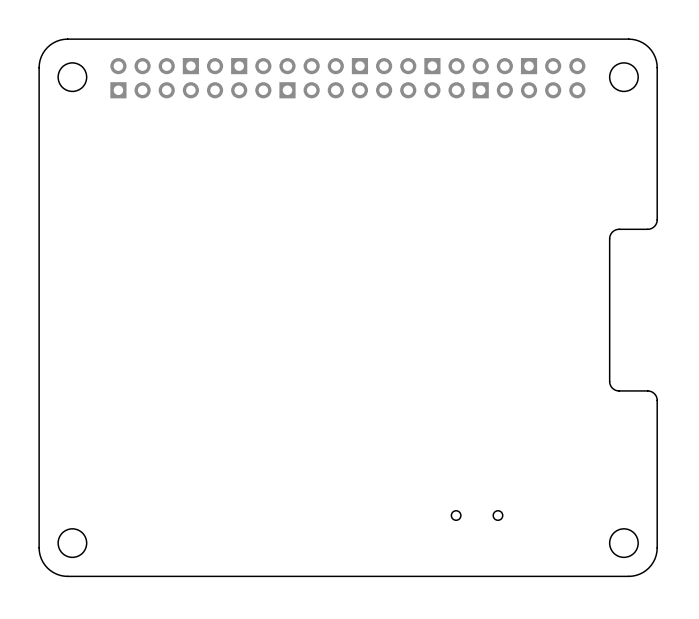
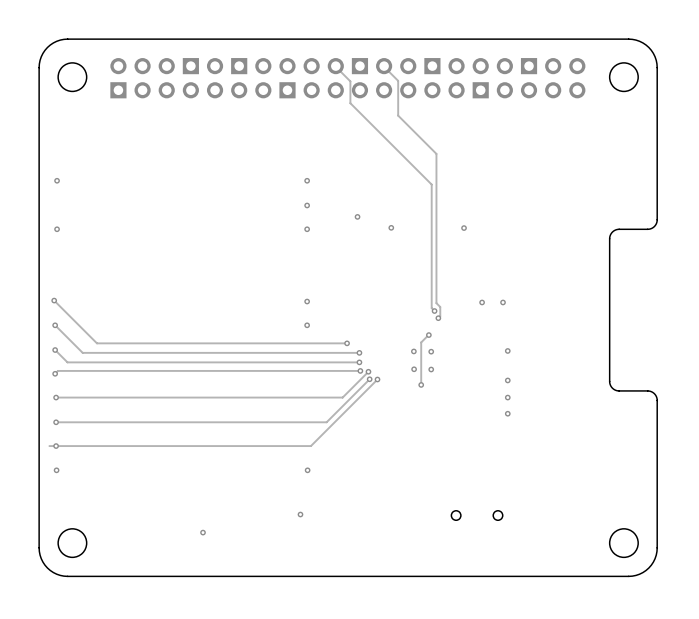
track: none -> (338, 69) (350, 81) (350, 103) (431, 184) (431, 308) (434, 311)
track: none -> (386, 69) (398, 80) (398, 115) (436, 153) (436, 303) (440, 307) (440, 316) (438, 318)
via: none -> (57, 180)
via: none -> (307, 180)
via: none -> (307, 205)
via: none -> (357, 216)
via: none -> (391, 227)
via: none -> (464, 228)
via: none -> (57, 229)
via: none -> (307, 229)
track: none -> (54, 300) (96, 343) (347, 343)
via: none -> (54, 300)
via: none -> (307, 301)
via: none -> (482, 302)
via: none -> (503, 302)
via: none -> (434, 311)
via: none -> (438, 318)
track: none -> (55, 325) (82, 352) (359, 352)
via: none -> (55, 325)
via: none -> (307, 325)
track: none -> (428, 335) (421, 342) (421, 384)
via: none -> (428, 335)
via: none -> (347, 343)
track: none -> (55, 350) (67, 362) (359, 362)
via: none -> (55, 350)
via: none -> (507, 350)
via: none -> (413, 351)
via: none -> (431, 351)
via: none -> (359, 352)
via: none -> (359, 362)
via: none -> (414, 369)
via: none -> (431, 369)
track: none -> (360, 370) (58, 370) (55, 373)
via: none -> (360, 370)
track: none -> (368, 371) (342, 397) (56, 397)
via: none -> (368, 371)
via: none -> (55, 373)
track: none -> (369, 379) (326, 422) (56, 422)
via: none -> (369, 379)
track: none -> (377, 379) (310, 446) (49, 446)
via: none -> (377, 379)
via: none -> (507, 380)
via: none -> (421, 384)
via: none -> (56, 397)
via: none -> (507, 397)
via: none -> (507, 413)
via: none -> (56, 422)
via: none -> (56, 446)
via: none -> (56, 470)
via: none -> (307, 470)
via: none -> (300, 514)
via: none -> (203, 532)

